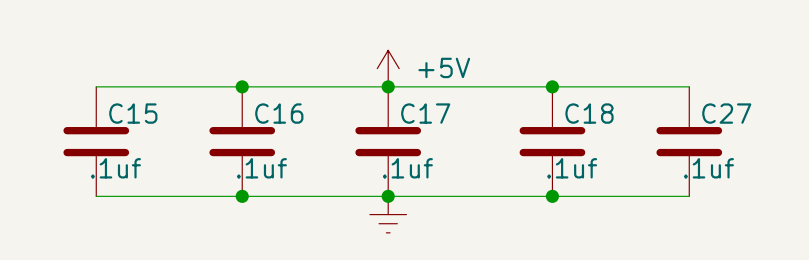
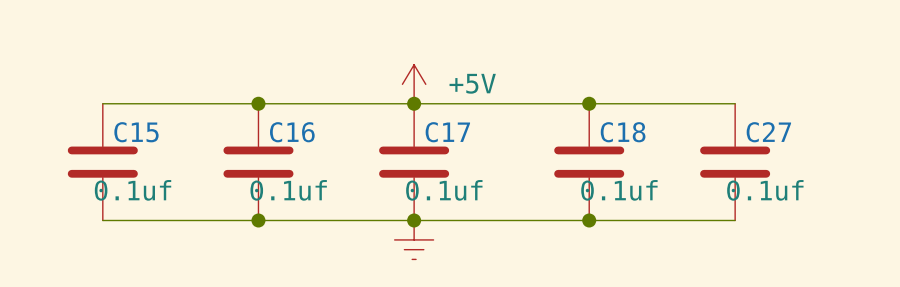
C15 value: .1uf (115, 168) -> 0.1uf (133, 190)
C16 value: .1uf (261, 168) -> 0.1uf (288, 190)
C17 value: .1uf (407, 168) -> 0.1uf (444, 190)
C18 value: .1uf (572, 168) -> 0.1uf (619, 190)
C27 value: .1uf (708, 168) -> 0.1uf (765, 190)

